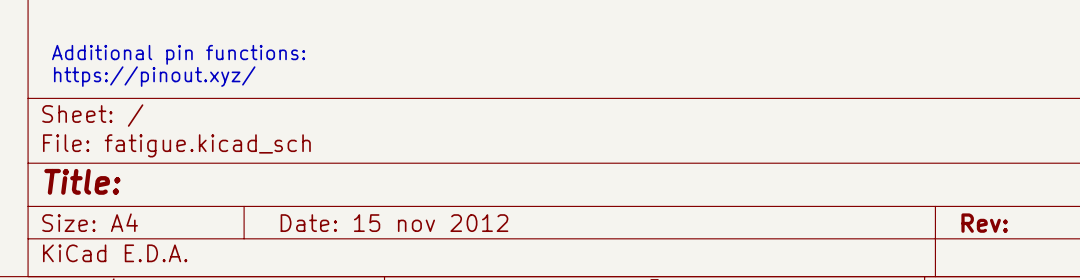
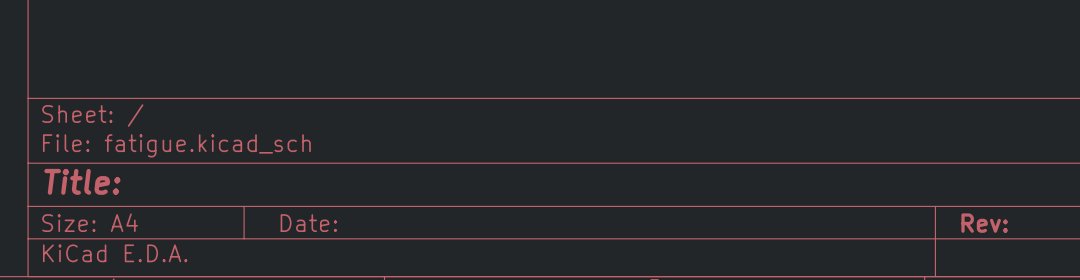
text: Additional pin functions: (178, 54) -> none
text: https://pinout.xyz/ (154, 76) -> none
title block: Date: 15 nov 2012 (394, 223) -> Date: (308, 223)

